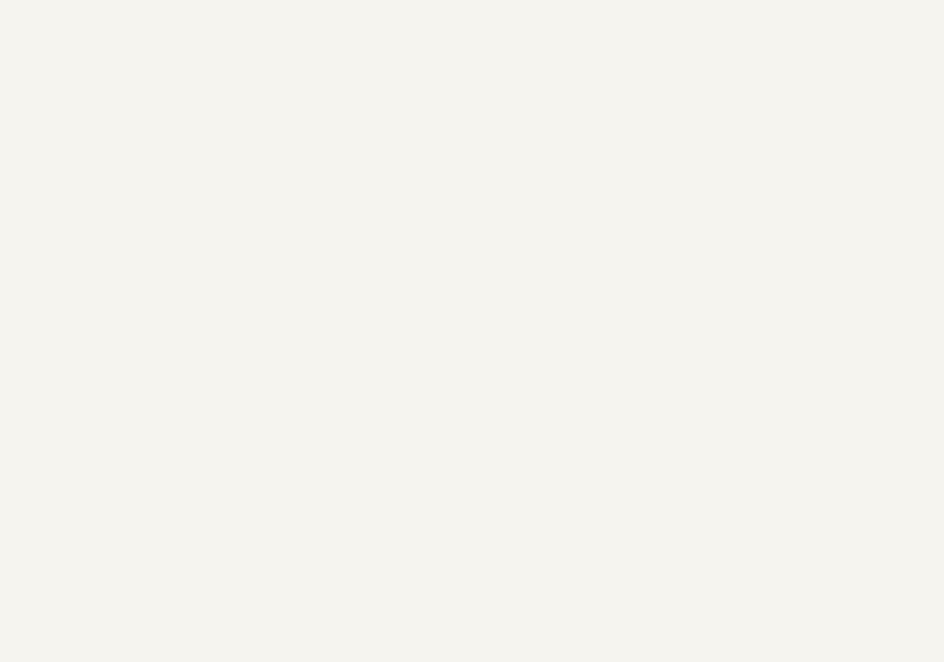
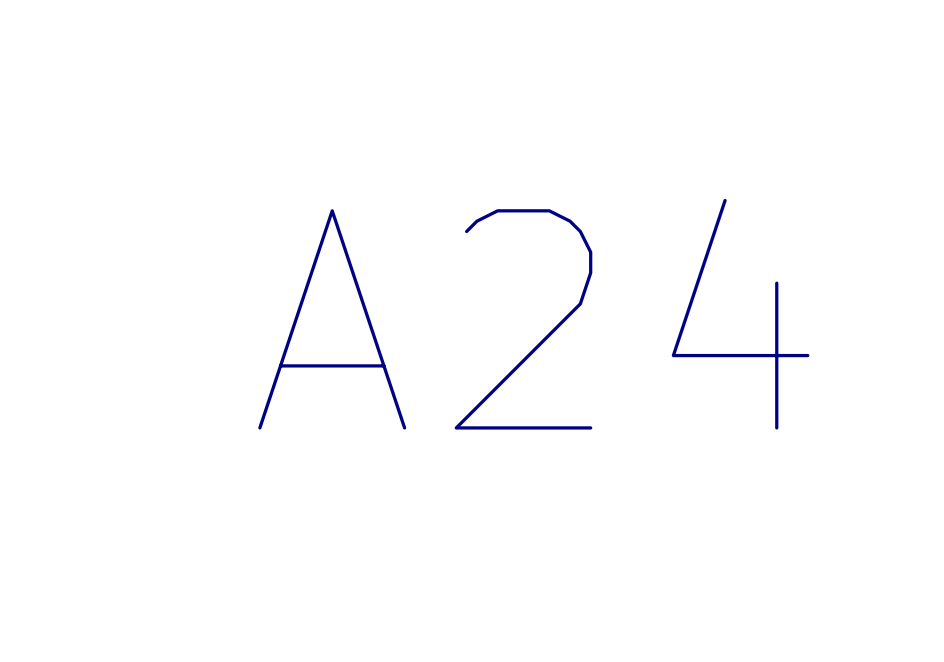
text: none -> A24 (533, 314)

